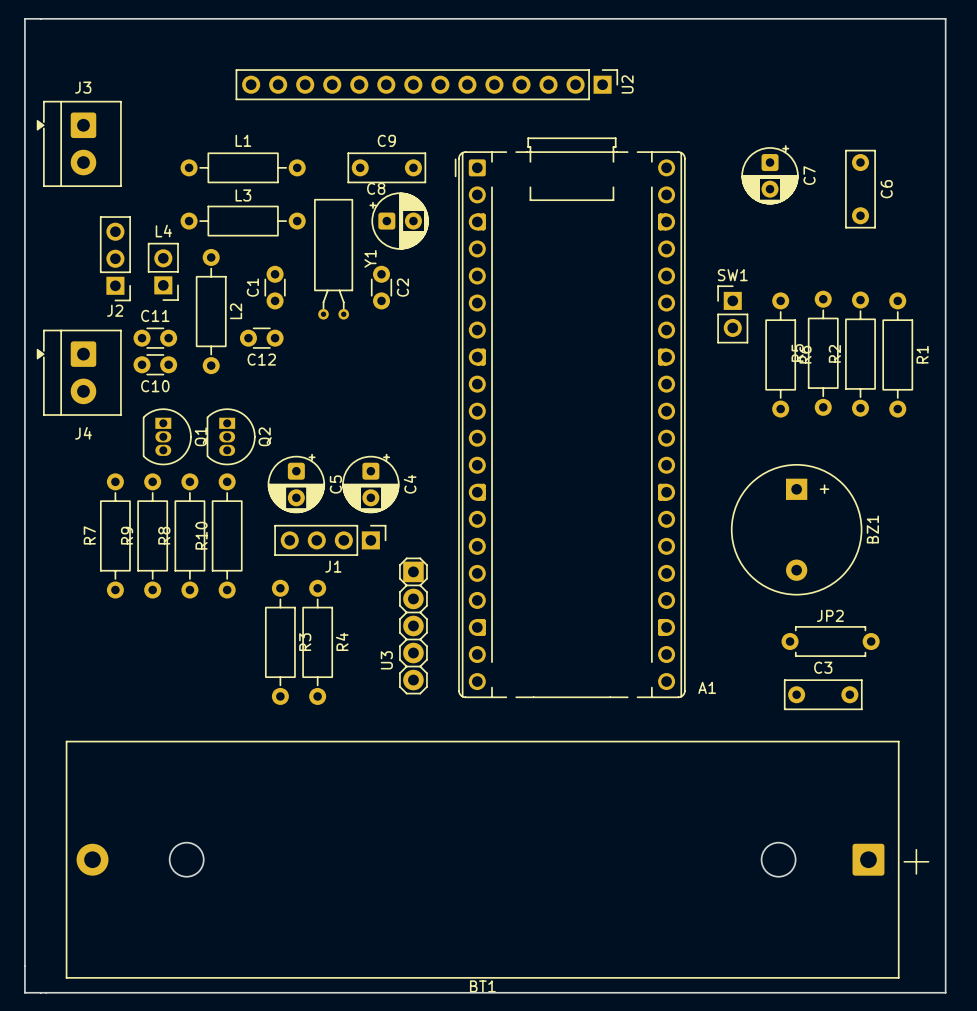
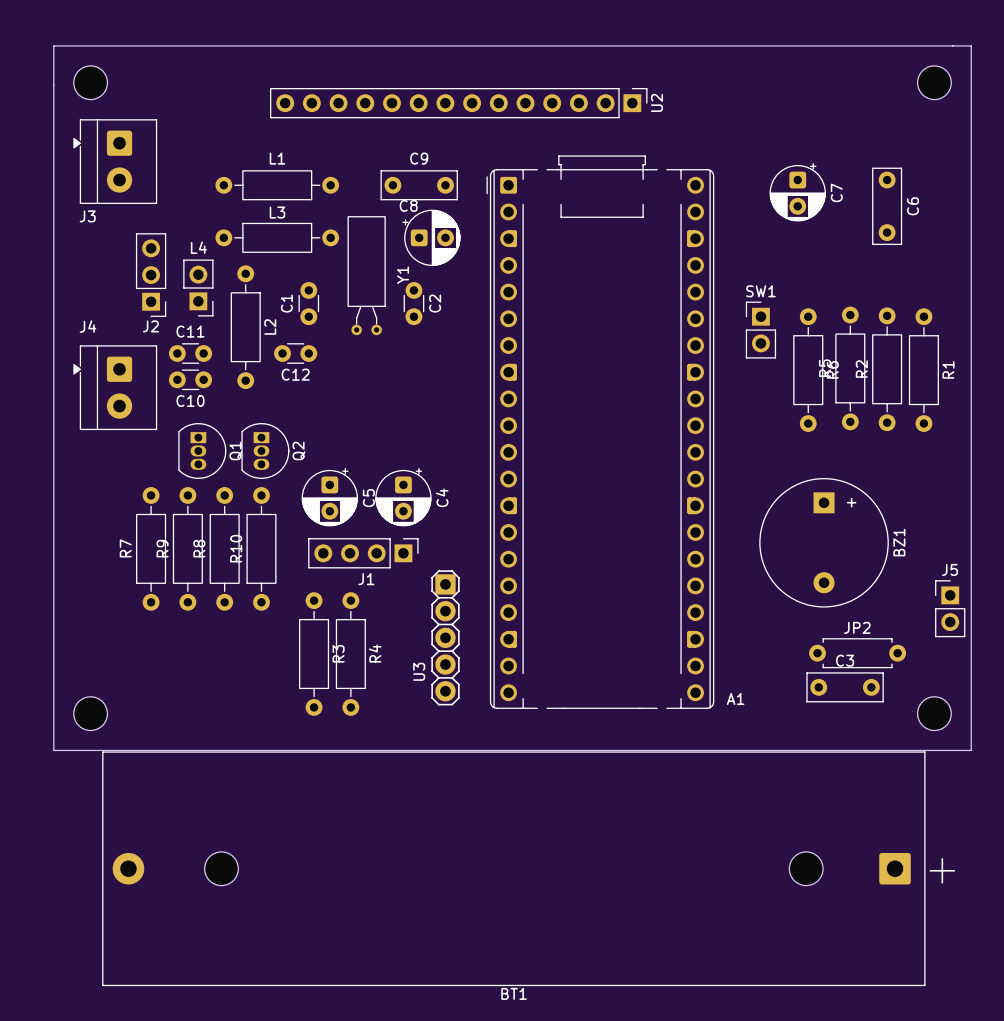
board edge: (945, 26) (945, 18) (24, 18) (24, 992) (945, 992) (945, 739) -> (971, 45) (53, 45) (53, 750) (971, 750)
part: none -> (90, 82)
part: none -> (934, 82)
J3 name position: J3 (83, 87) -> J3 (87, 216)
J4 name position: J4 (83, 433) -> J4 (87, 326)
J5: none -> (950, 608)
C3 position: (823, 694) -> (845, 687)
part: none -> (90, 713)
part: none -> (934, 713)

